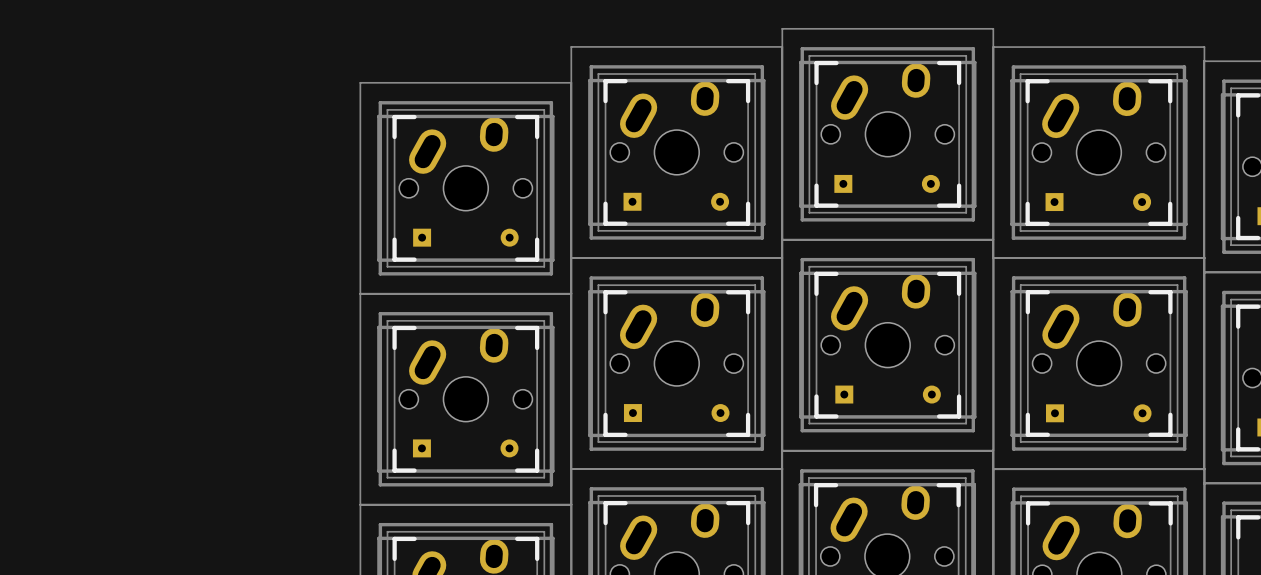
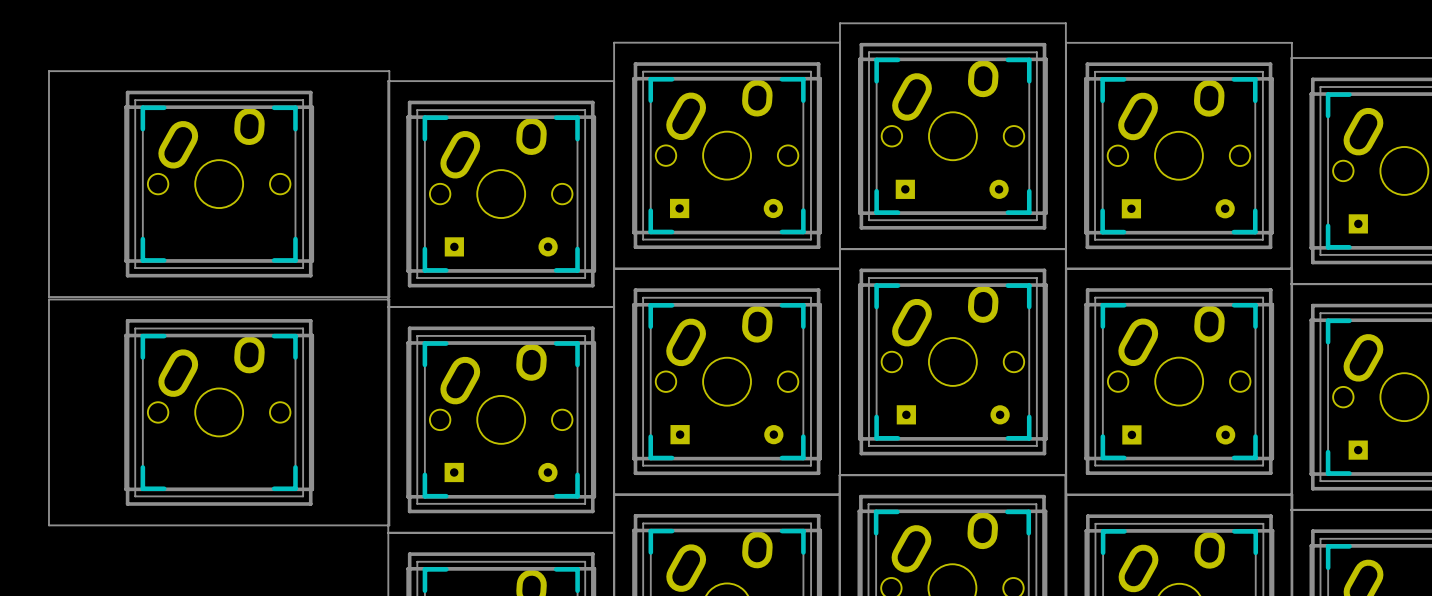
part: none -> (219, 184)
part: none -> (219, 412)

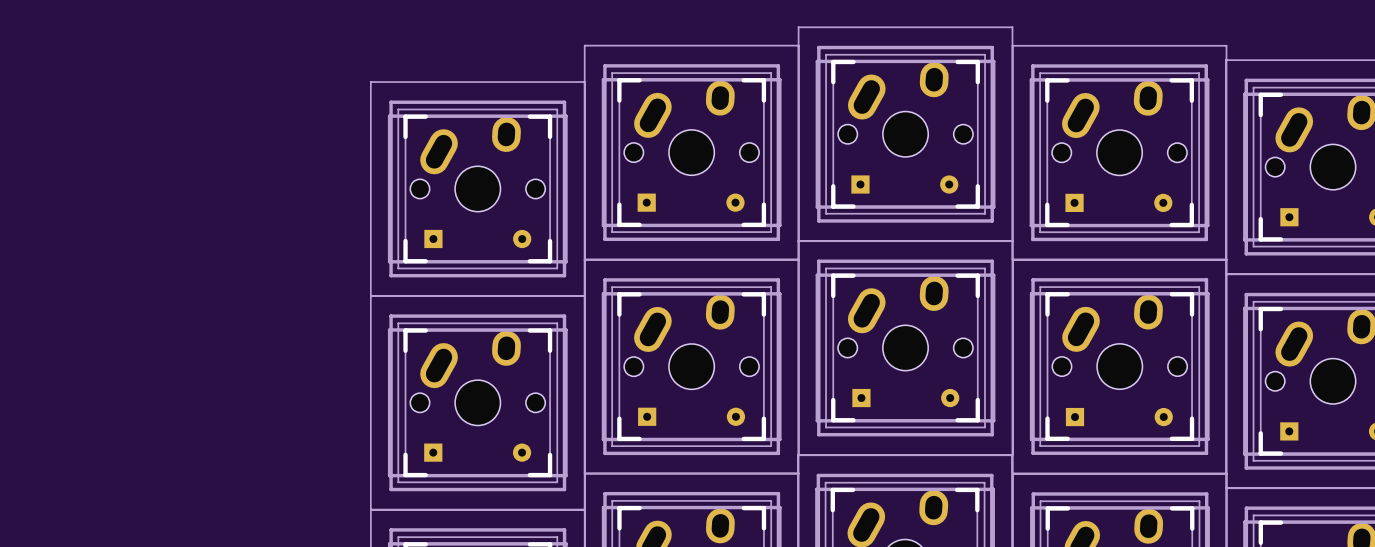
part: (219, 184) -> none
part: (219, 412) -> none

